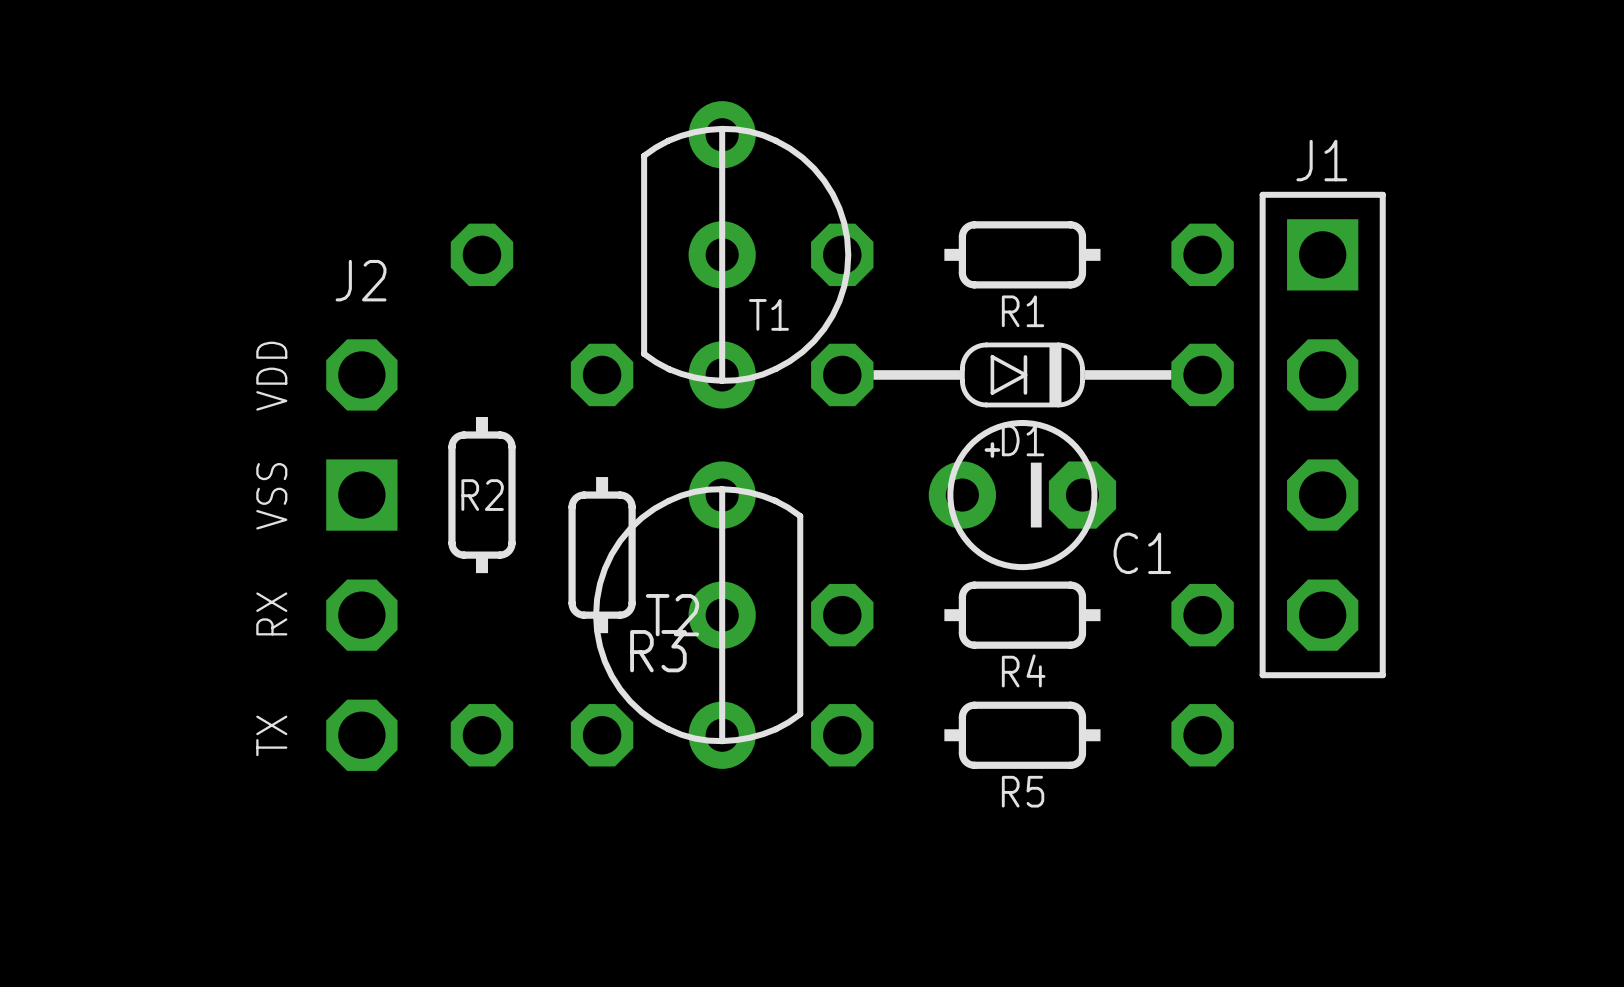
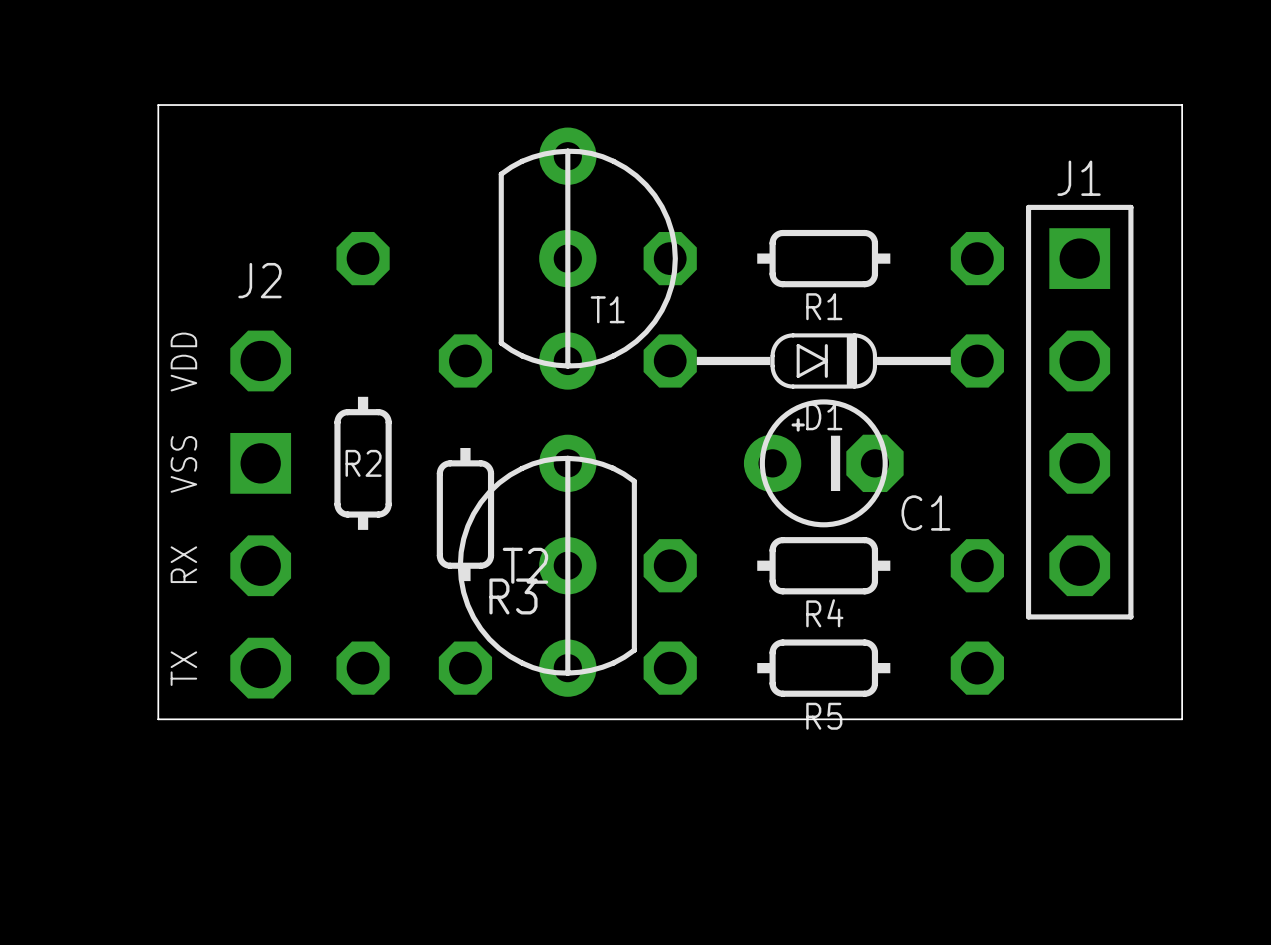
board edge: none -> (158, 105) (1182, 105) (1182, 719) (158, 719) (158, 105)

